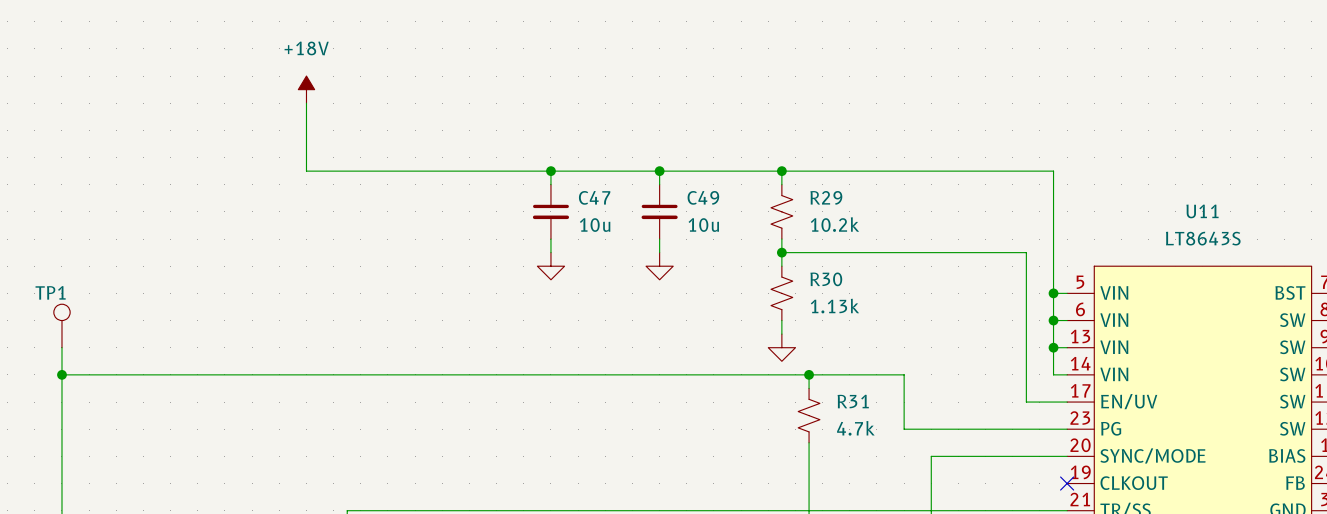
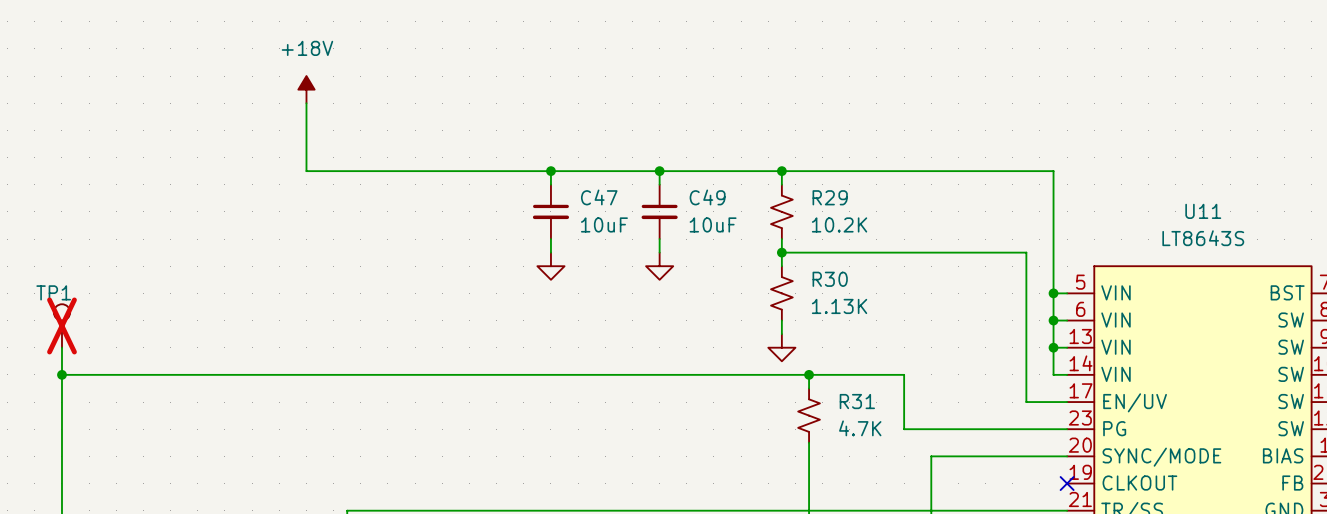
R29 value: 10.2k (834, 224) -> 10.2K (839, 224)
C47 value: 10u (595, 225) -> 10uF (604, 224)
C49 value: 10u (703, 225) -> 10uF (713, 224)
R30 value: 1.13k (834, 306) -> 1.13K (839, 306)
TP1 do-not-place cross: none -> (61, 325)
R31 value: 4.7k (855, 428) -> 4.7K (860, 428)

